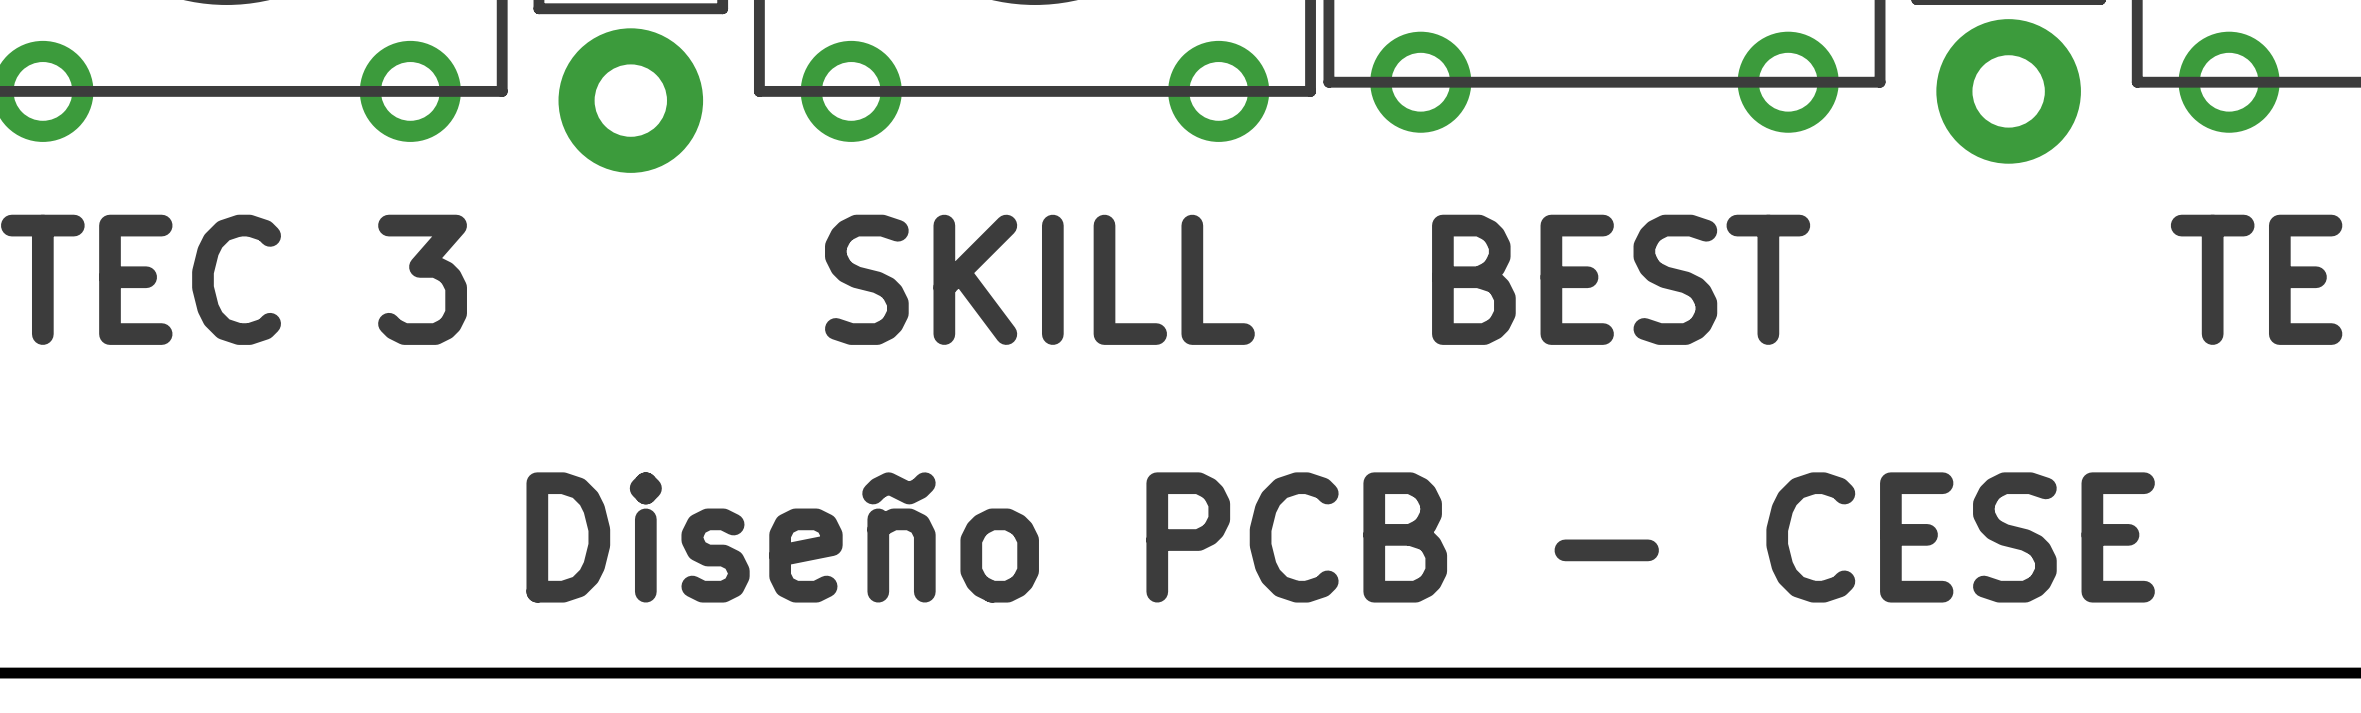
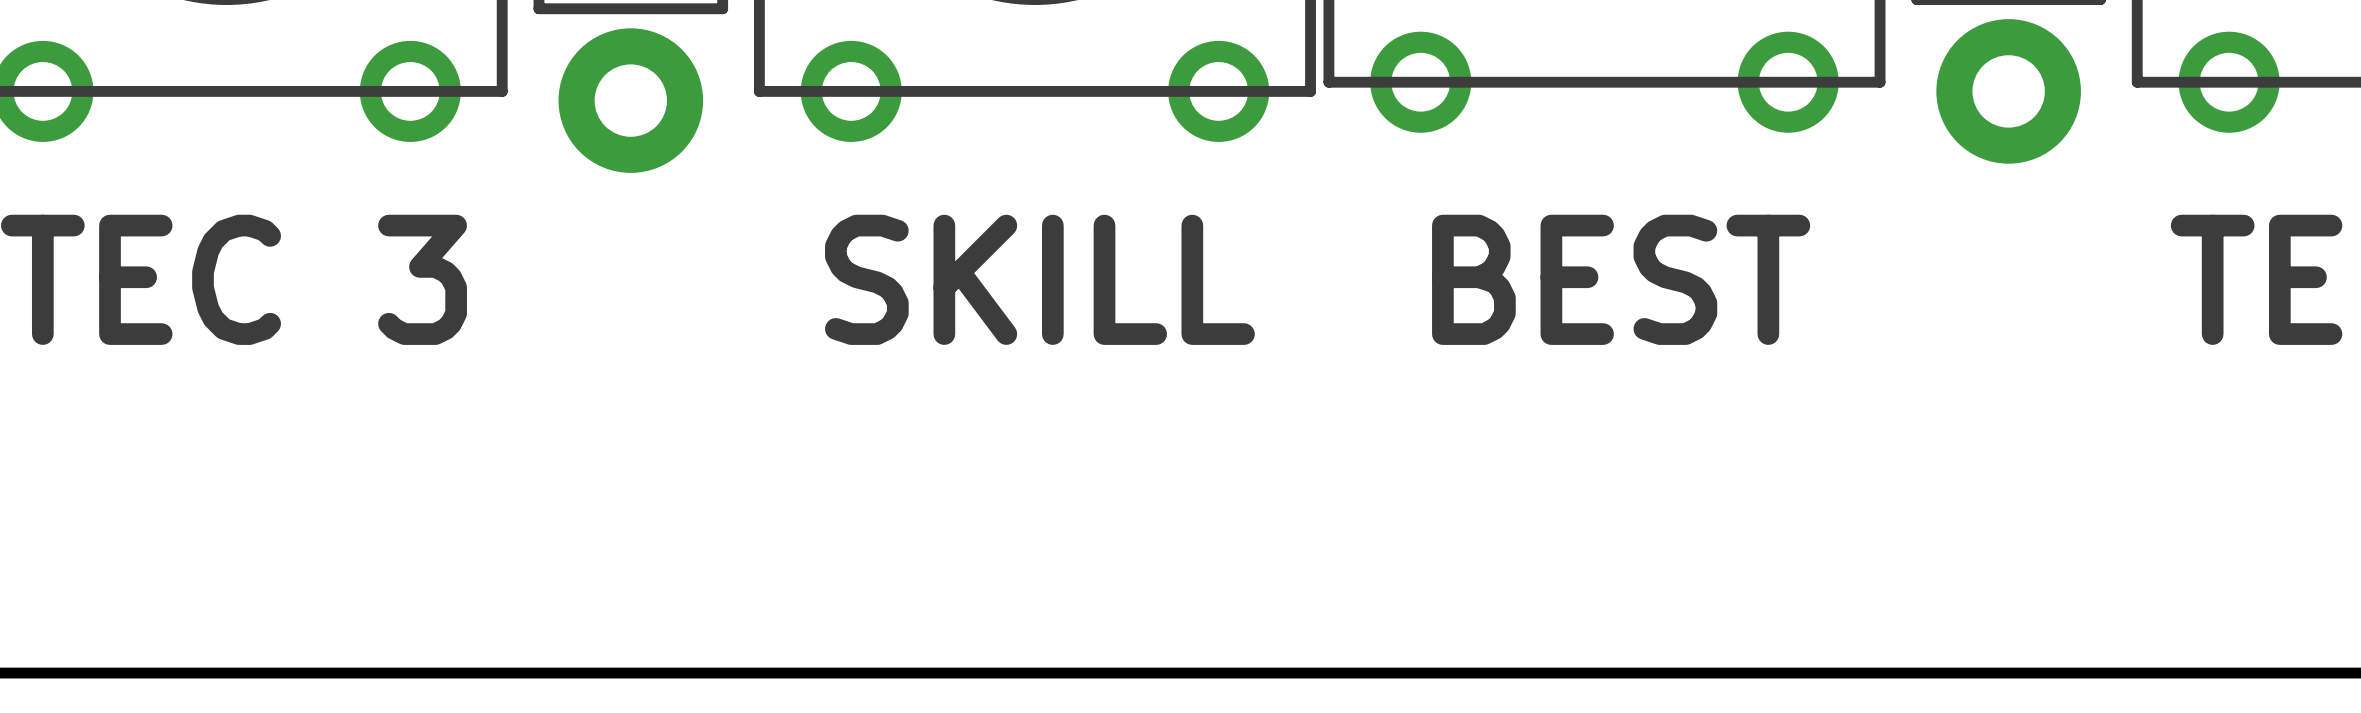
text: Diseño PCB - CESE (1340, 537) -> none

